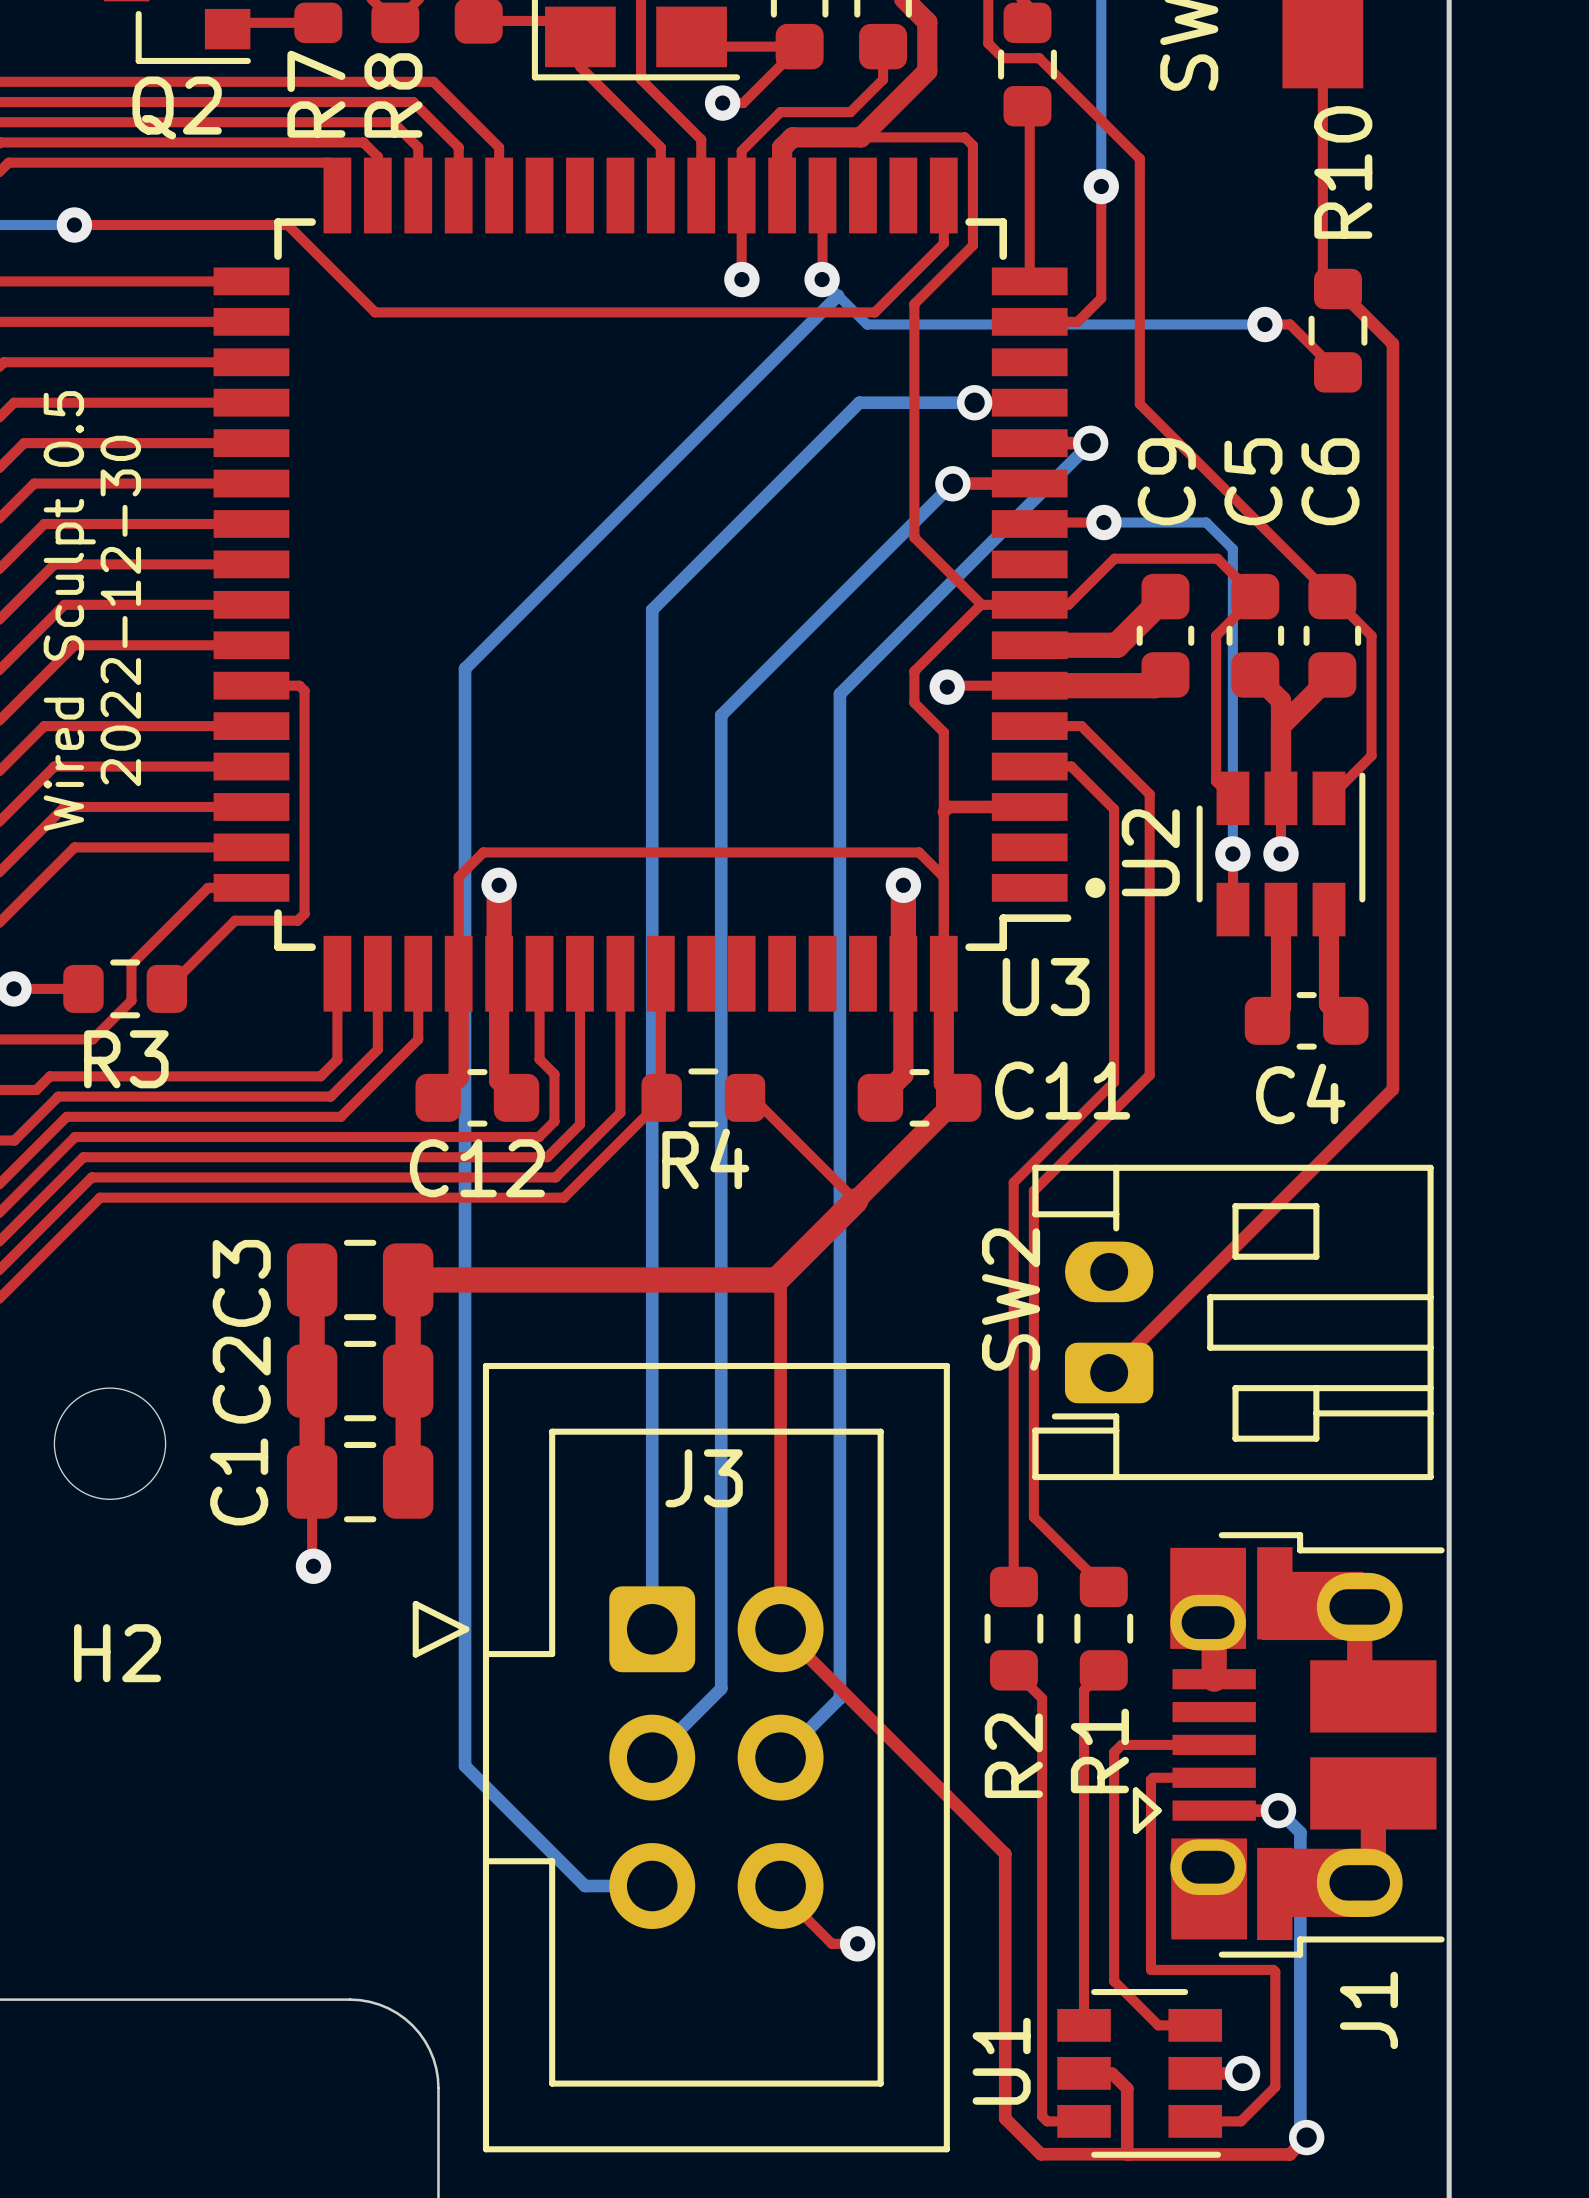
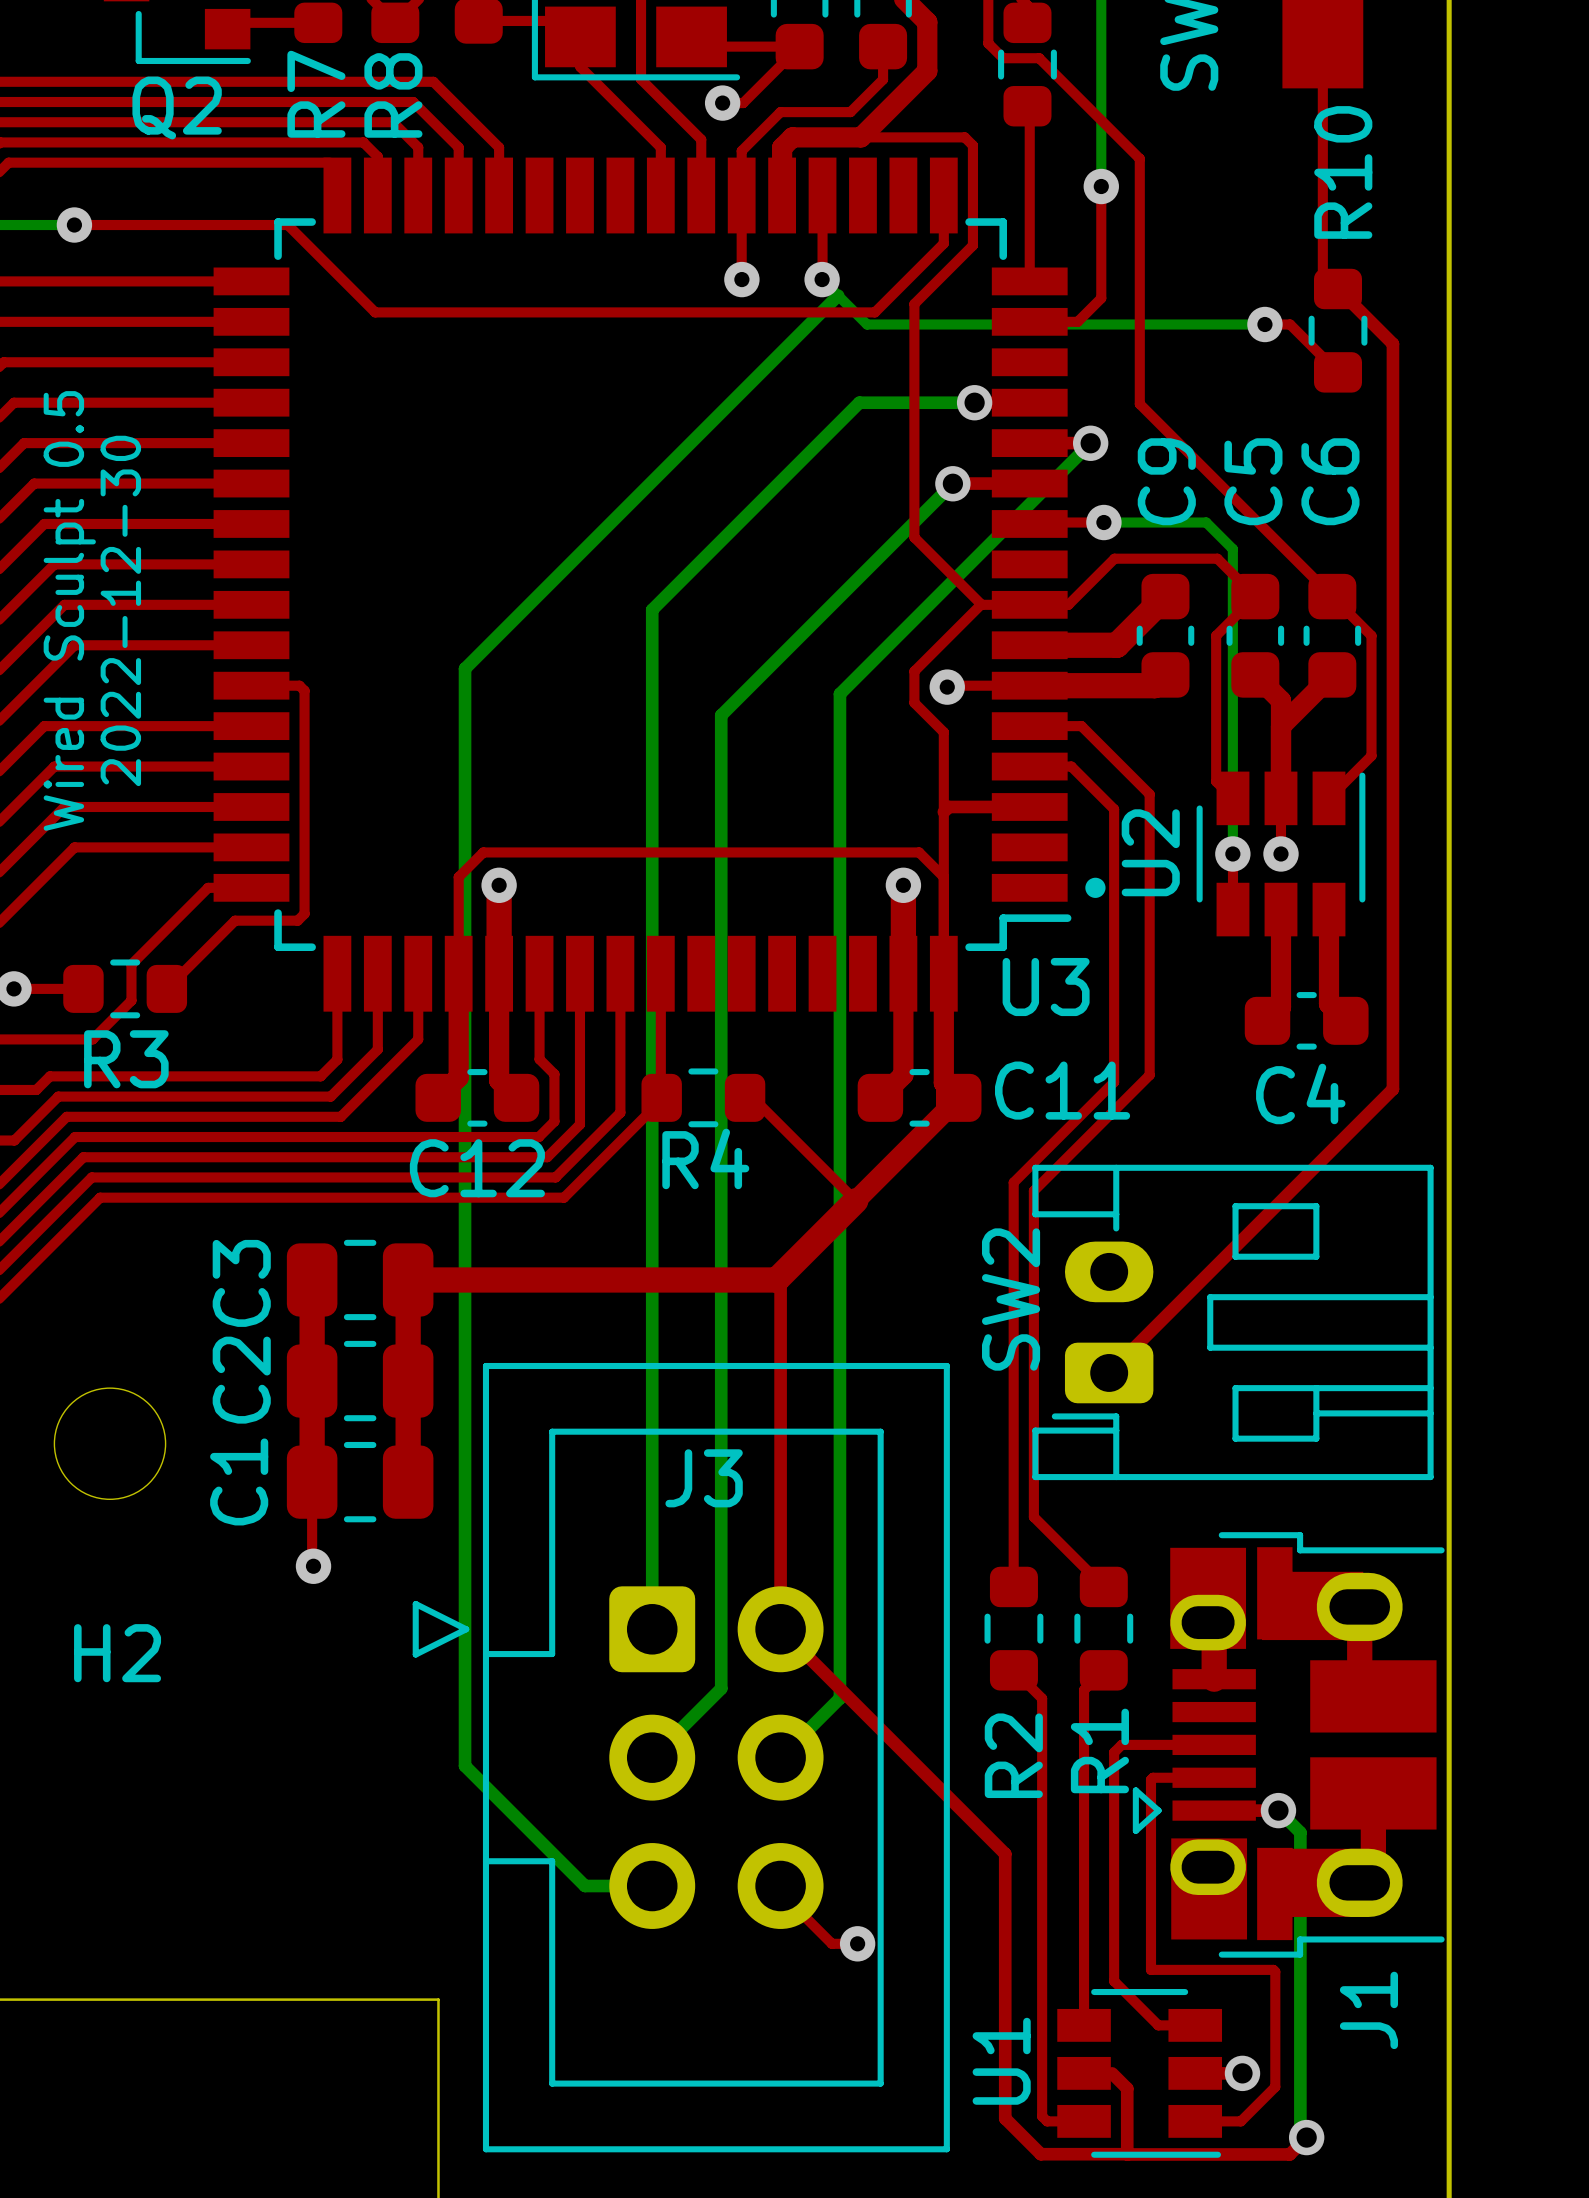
board edge: (350, 1999) (379, 2004) (397, 2013) (412, 2025) (429, 2049) (436, 2068) (438, 2088) -> (350, 1999) (438, 1999) (438, 2088)

